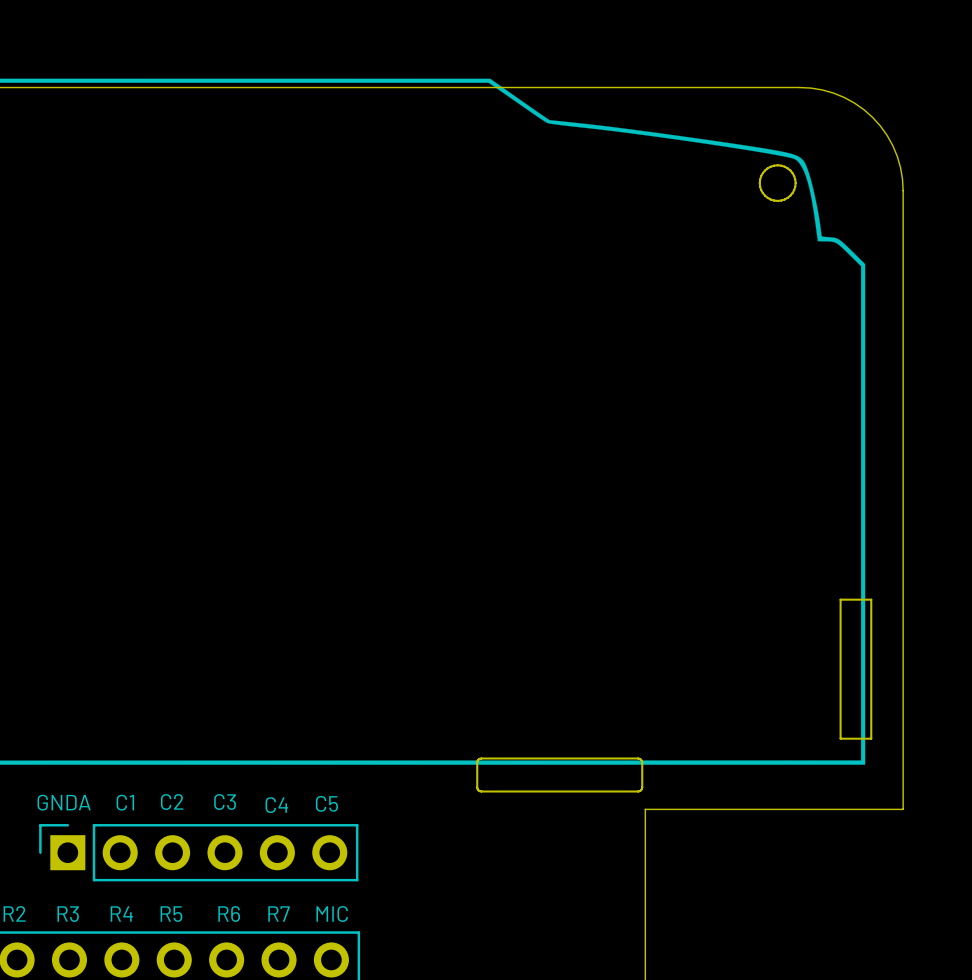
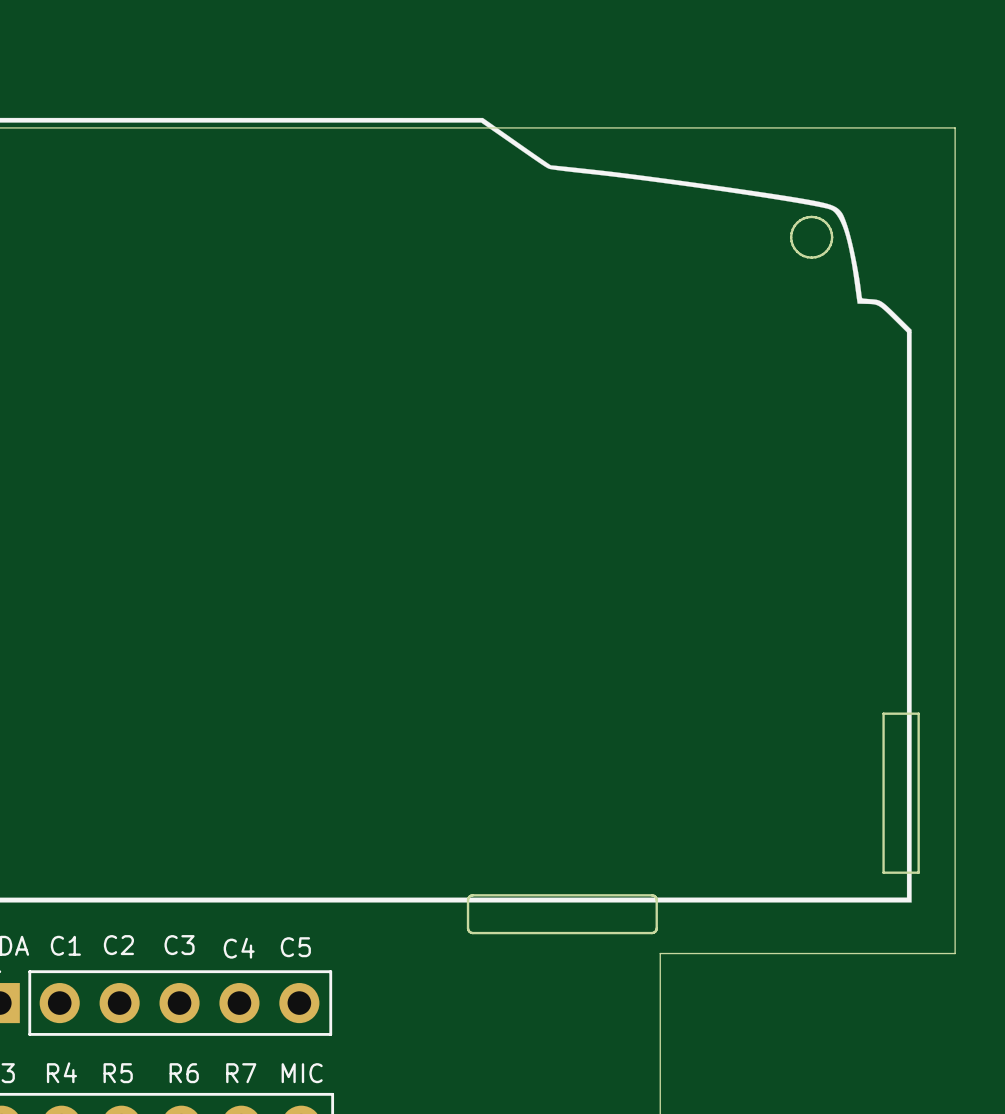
board edge: (799, 87) (833, 93) (854, 103) (872, 117) (892, 145) (900, 167) (903, 190) -> (836, 127) (955, 127) (955, 245)

